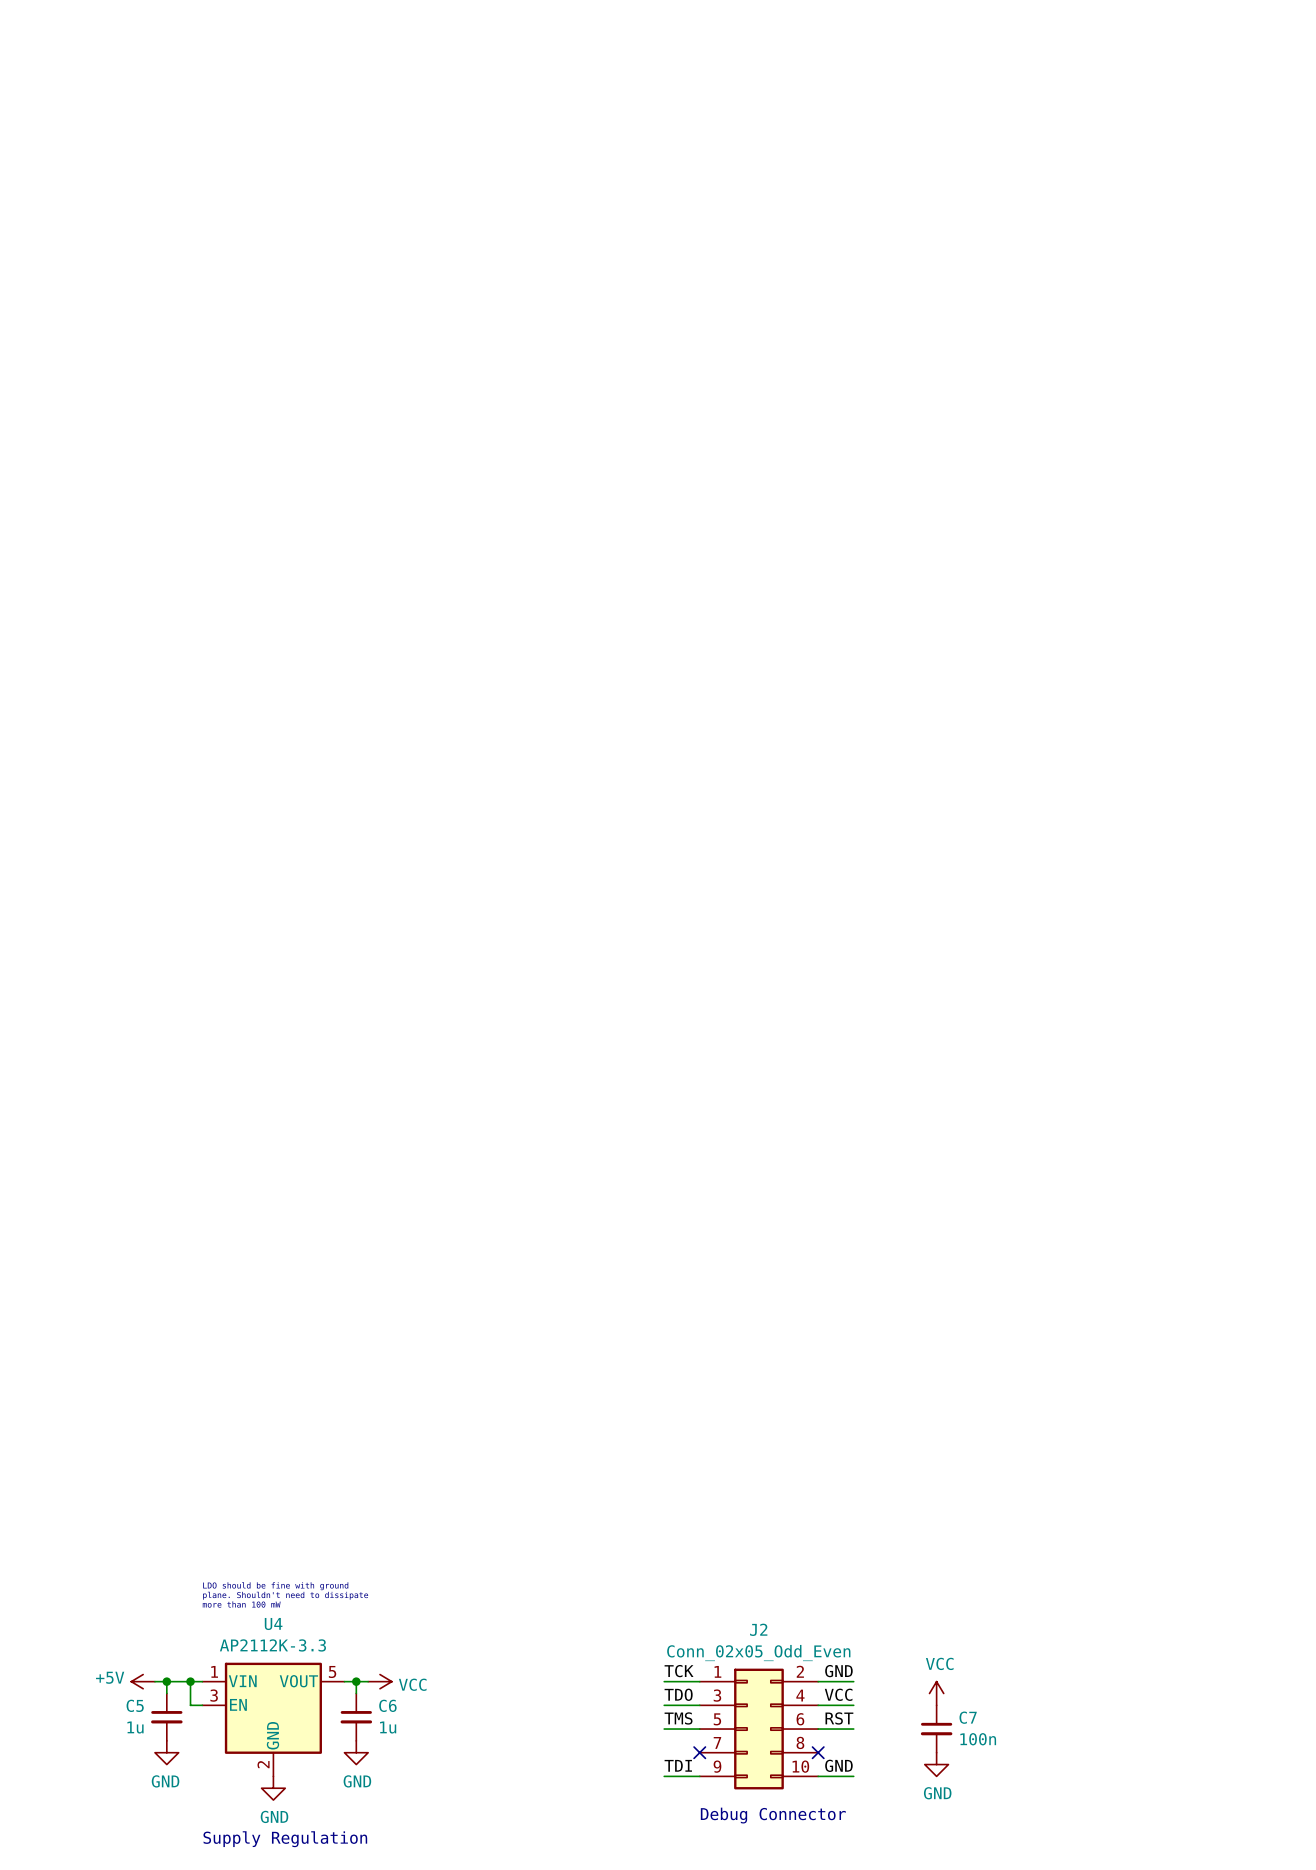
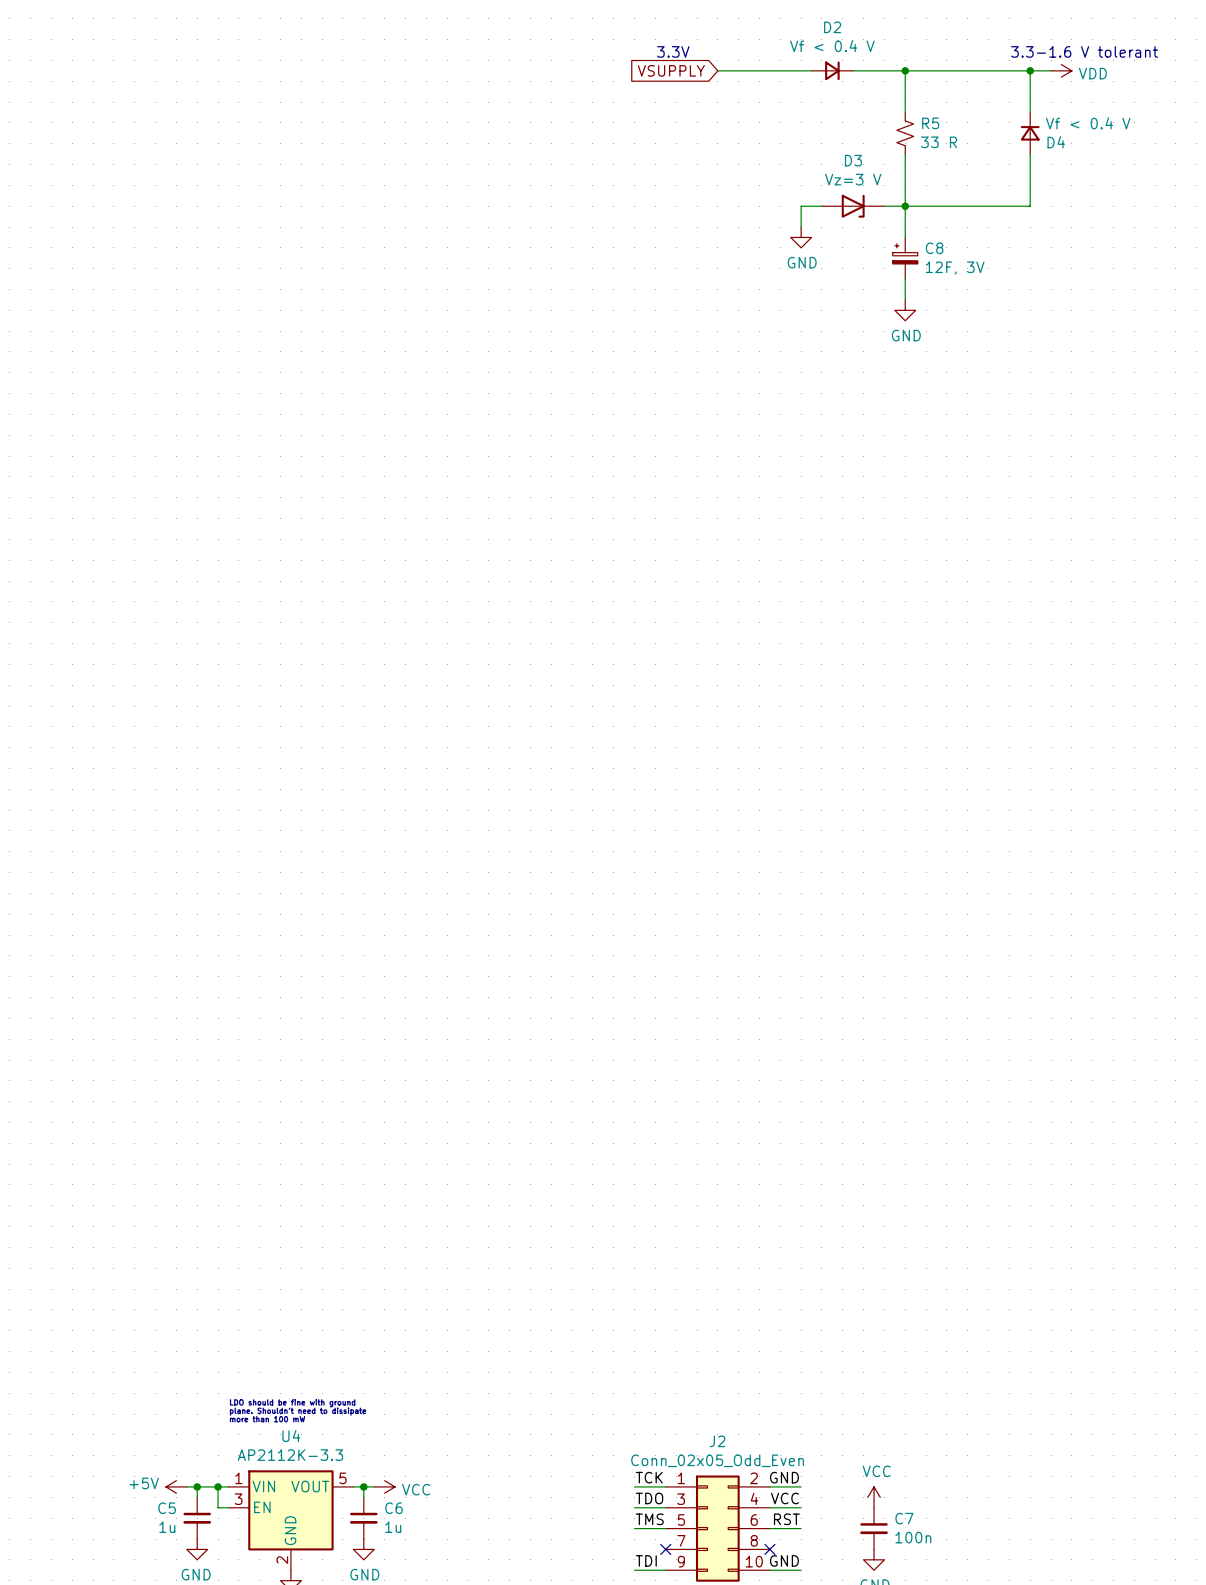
text: none -> 3.3V (673, 51)
text: none -> 3.3-1.6 V tolerant (1084, 51)
global label: none -> VSUPPLY (671, 70)
wire: none -> (717, 70) (811, 70)
D2: none -> Vf < 0.4 V (832, 70)
wire: none -> (853, 70) (1051, 70)
wire: none -> (905, 70) (905, 112)
junction: none -> (905, 70)
wire: none -> (1030, 70) (1030, 112)
junction: none -> (1030, 70)
power symbol: none -> VDD (1061, 70)
R5: none -> 33 R (905, 133)
D4: none -> Vf < 0.4 V (1030, 133)
wire: none -> (905, 154) (905, 237)
wire: none -> (1030, 154) (1030, 206) (884, 206)
wire: none -> (821, 206) (801, 206) (801, 227)
D3: none -> Vz=3 V (853, 206)
junction: none -> (905, 206)
power symbol: none -> GND (801, 237)
C8: none -> 12F, 3V (905, 258)
wire: none -> (905, 279) (905, 299)
power symbol: none -> GND (905, 310)

